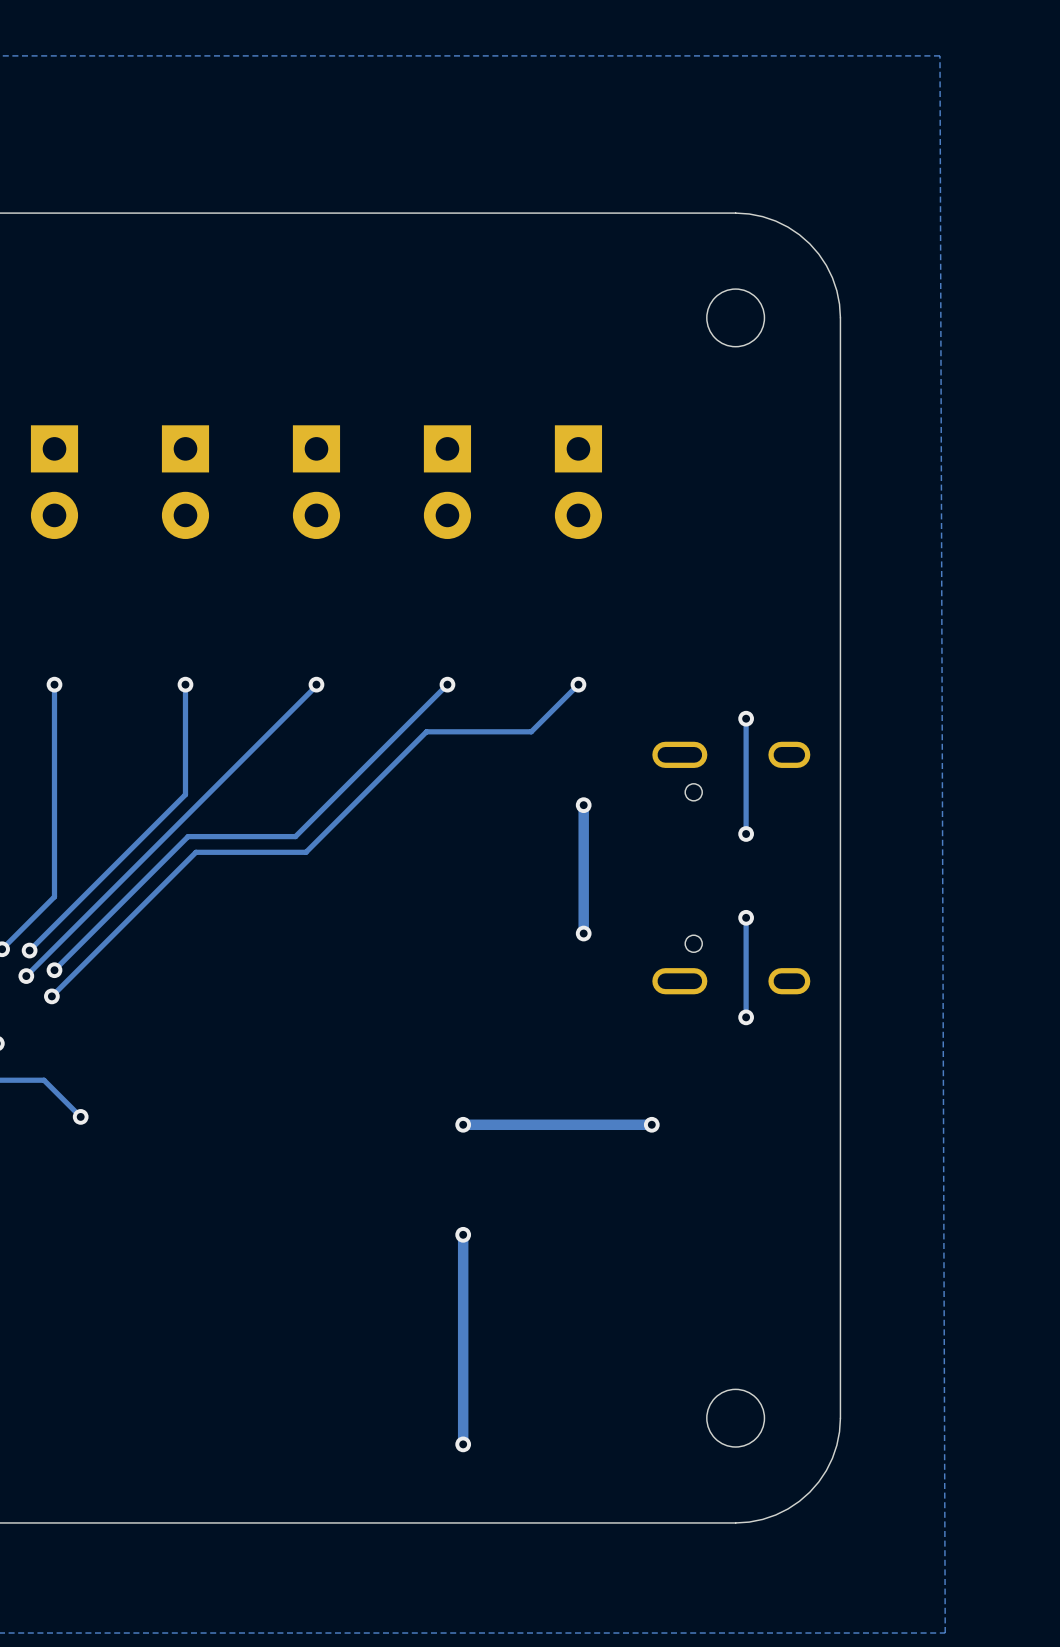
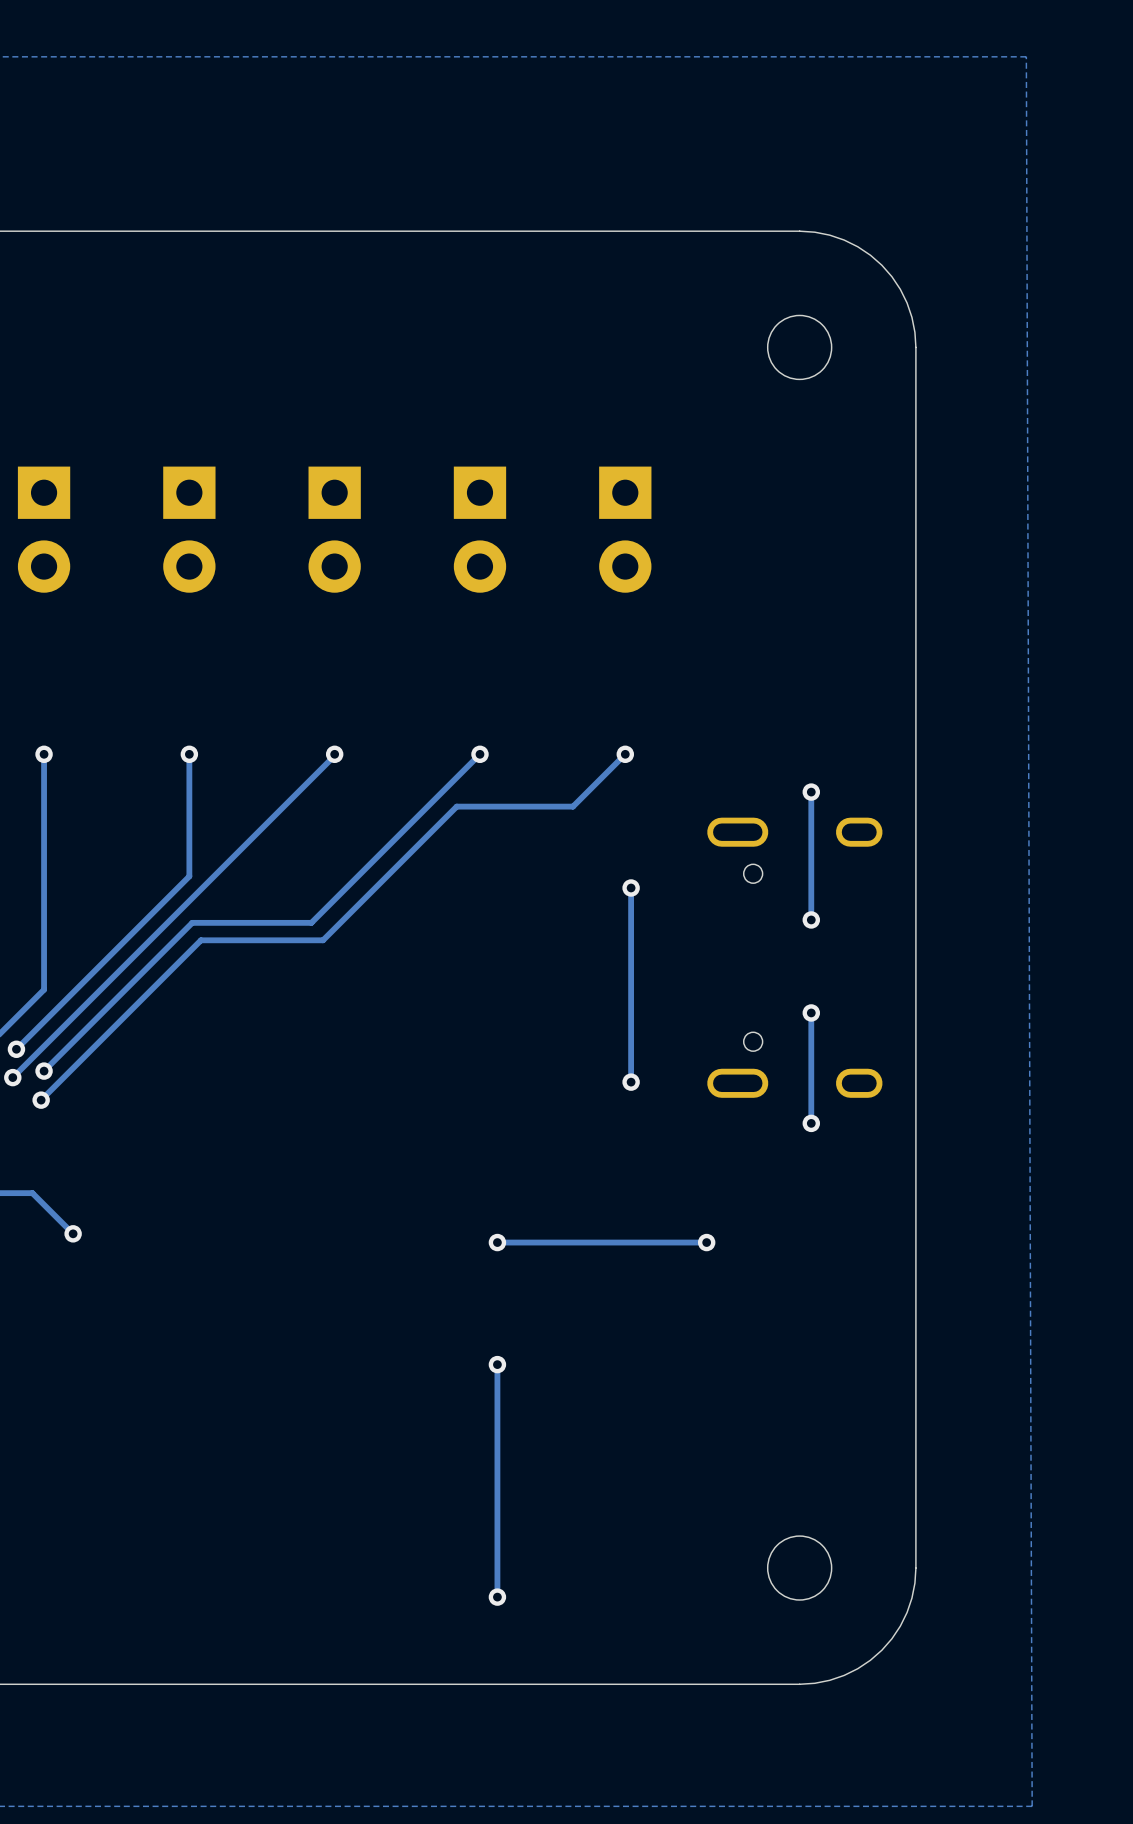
track width: thick (583, 805) (583, 933) -> thin (631, 887) (631, 1030)
track: none -> (631, 1030) (631, 1082)
via position: (583, 933) -> (631, 1082)
track width: thick (651, 1124) (463, 1124) -> thin (706, 1242) (497, 1242)
track width: thick (463, 1234) (463, 1444) -> thin (497, 1364) (497, 1597)

